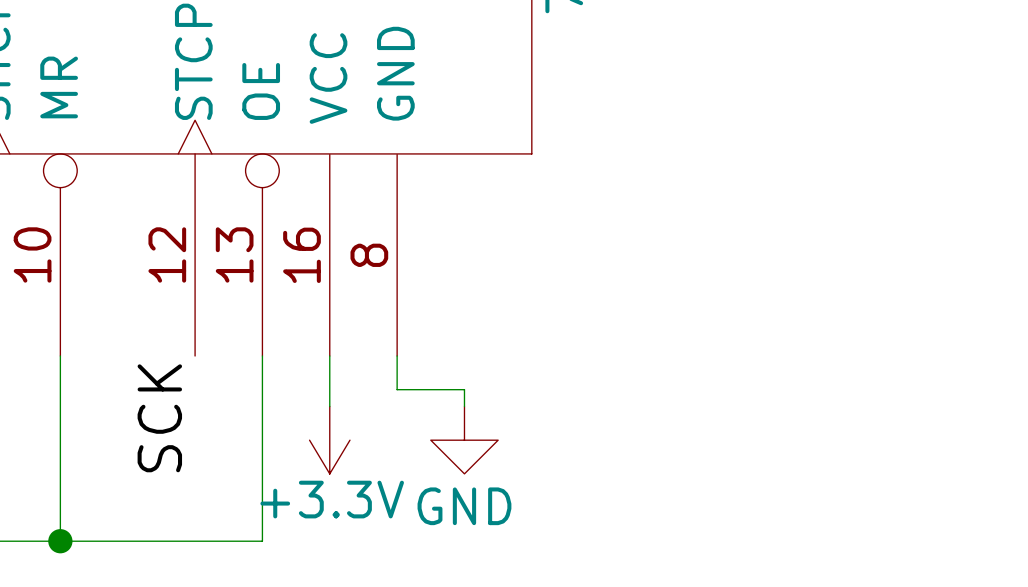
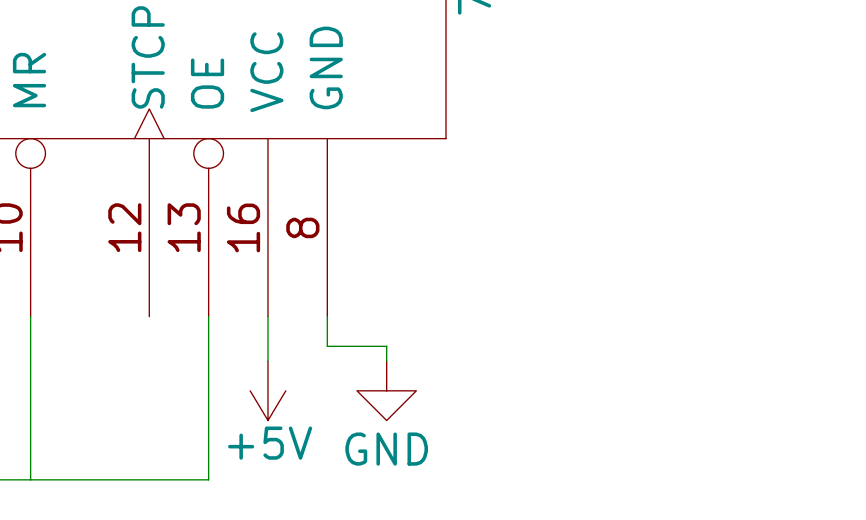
label: SCK (159, 418) -> none
power symbol: +3.3V (329, 440) -> +5V (267, 390)
junction: (60, 541) -> none

